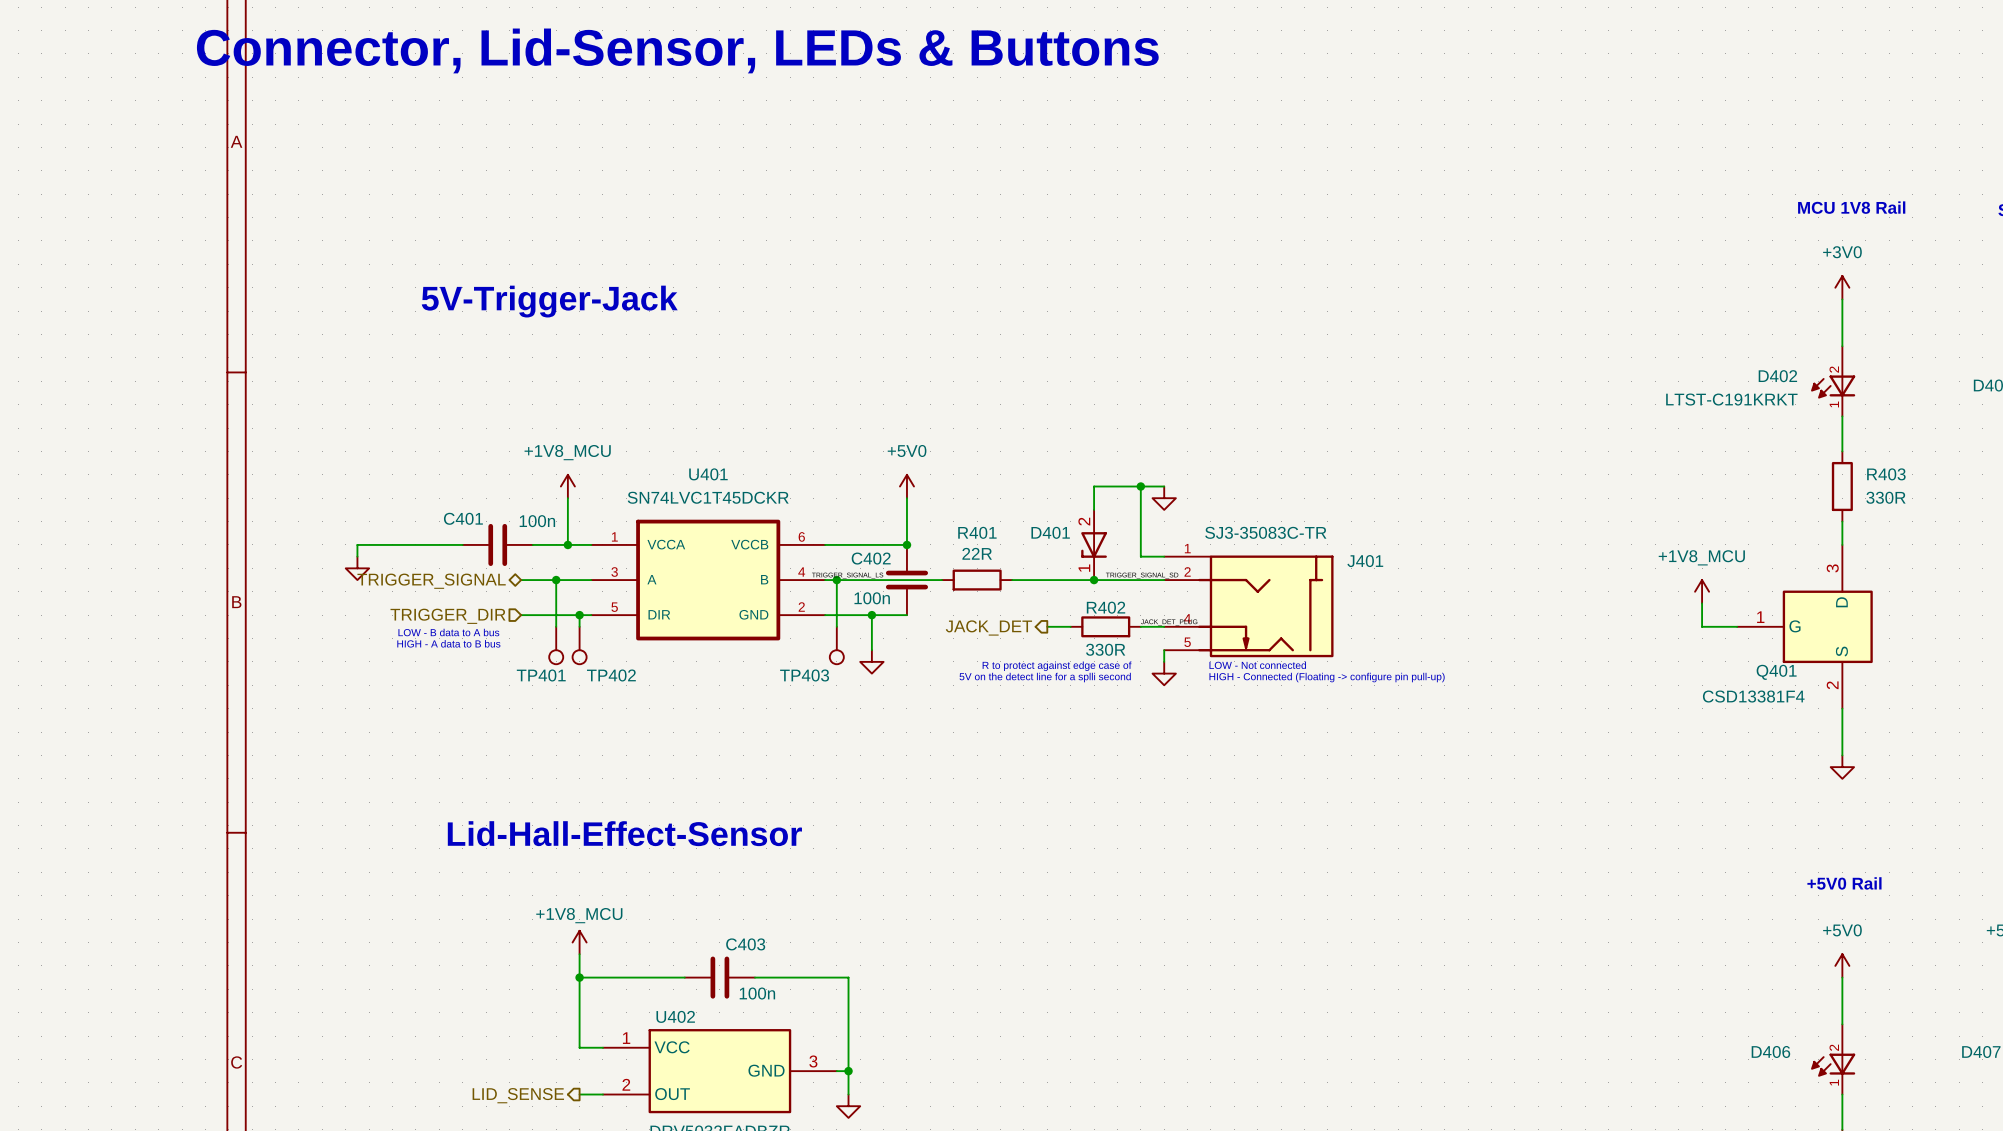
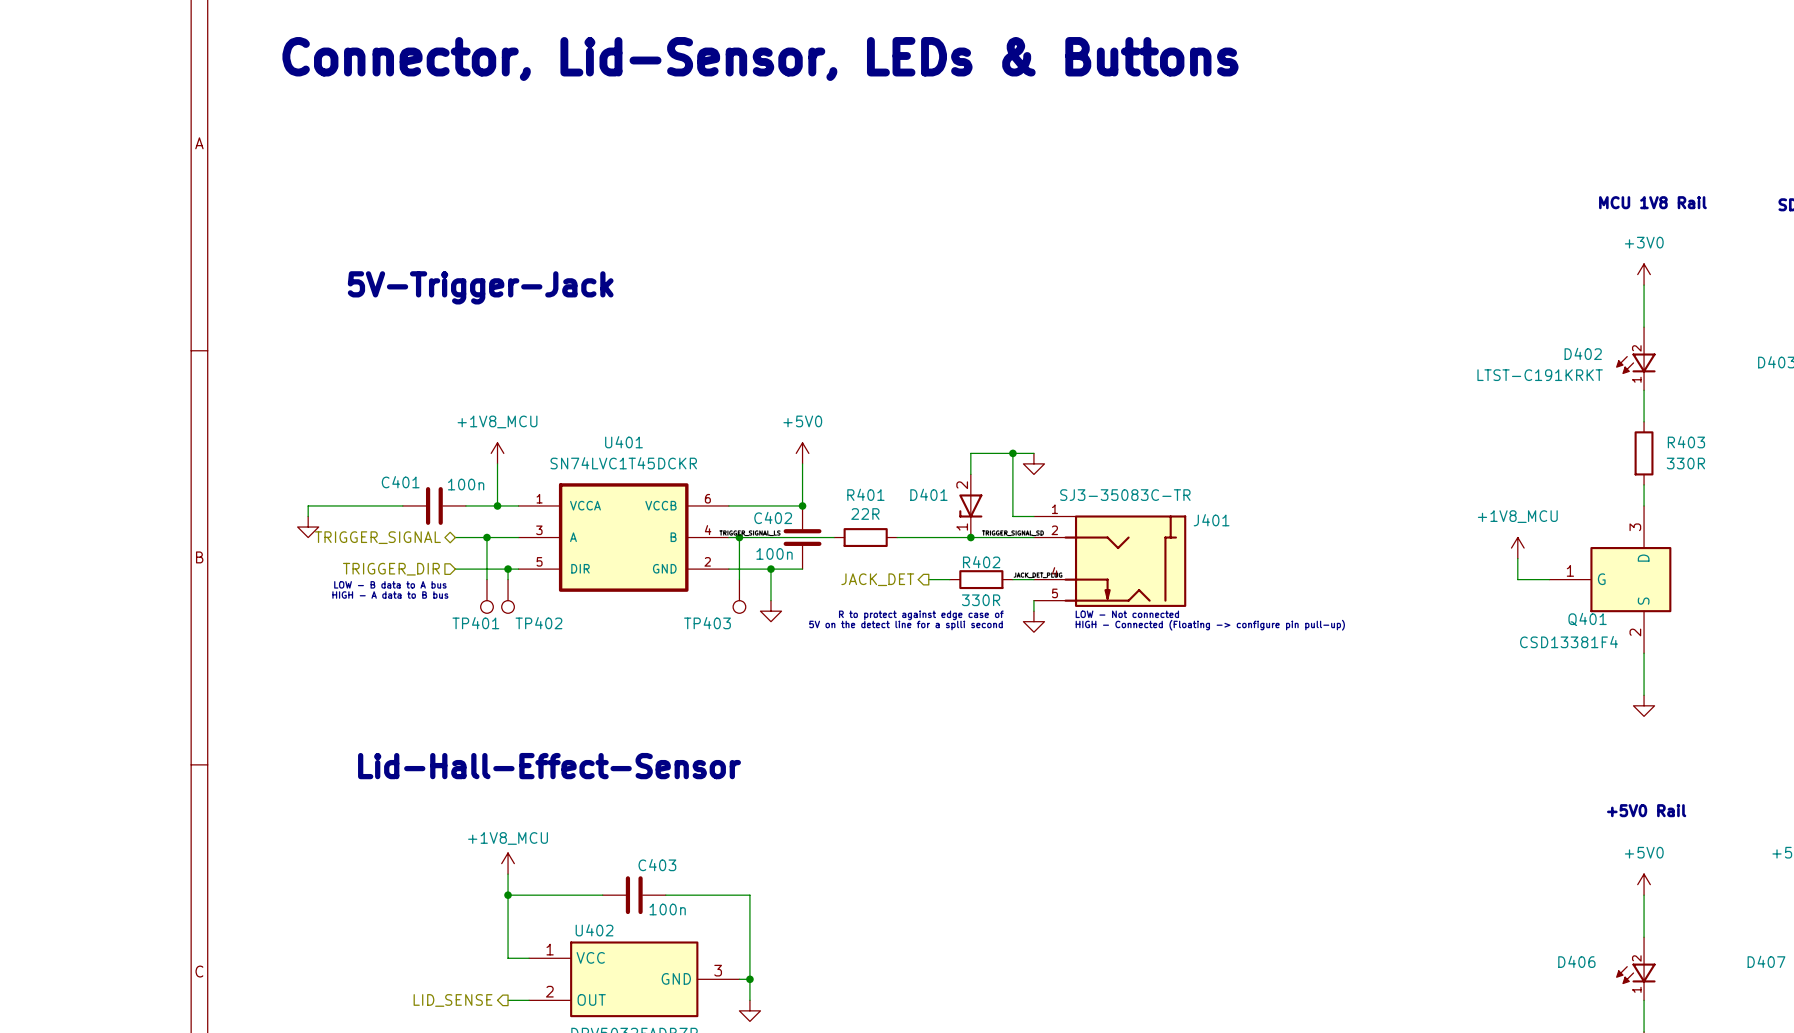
text position: Connector, Lid-Sensor, LEDs & Buttons (677, 50) -> Connector, Lid-Sensor, LEDs & Buttons (760, 59)

